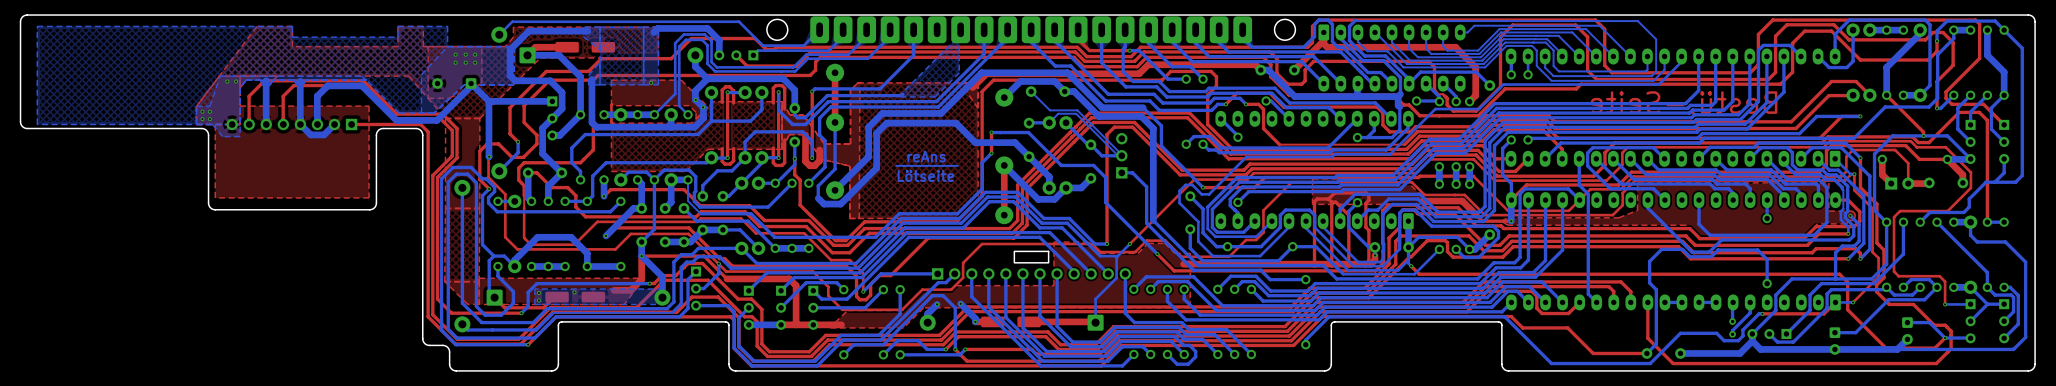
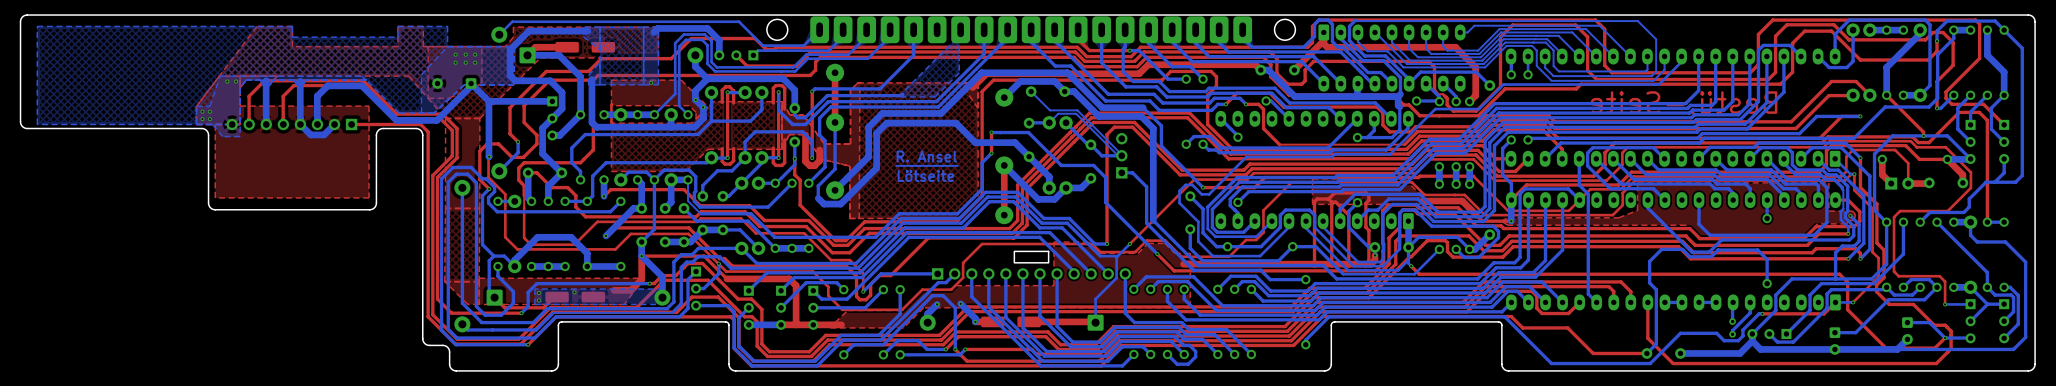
text: reAns (926, 156) -> R. Ansel (926, 156)

